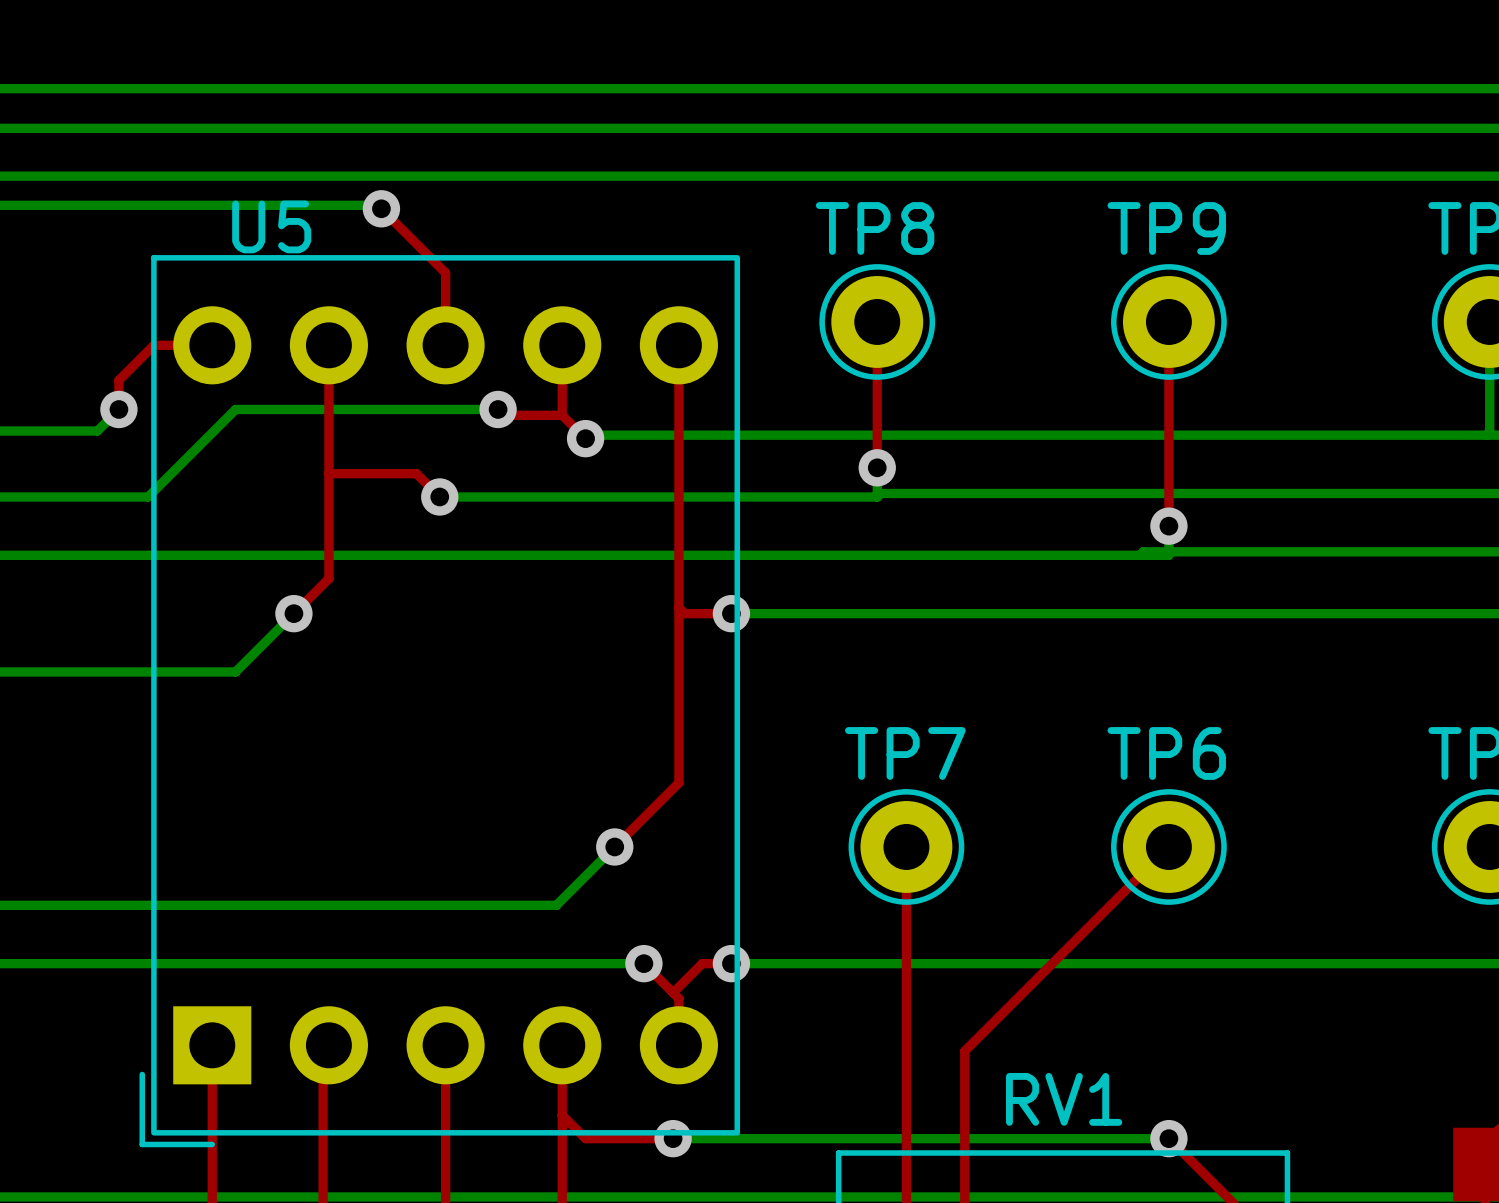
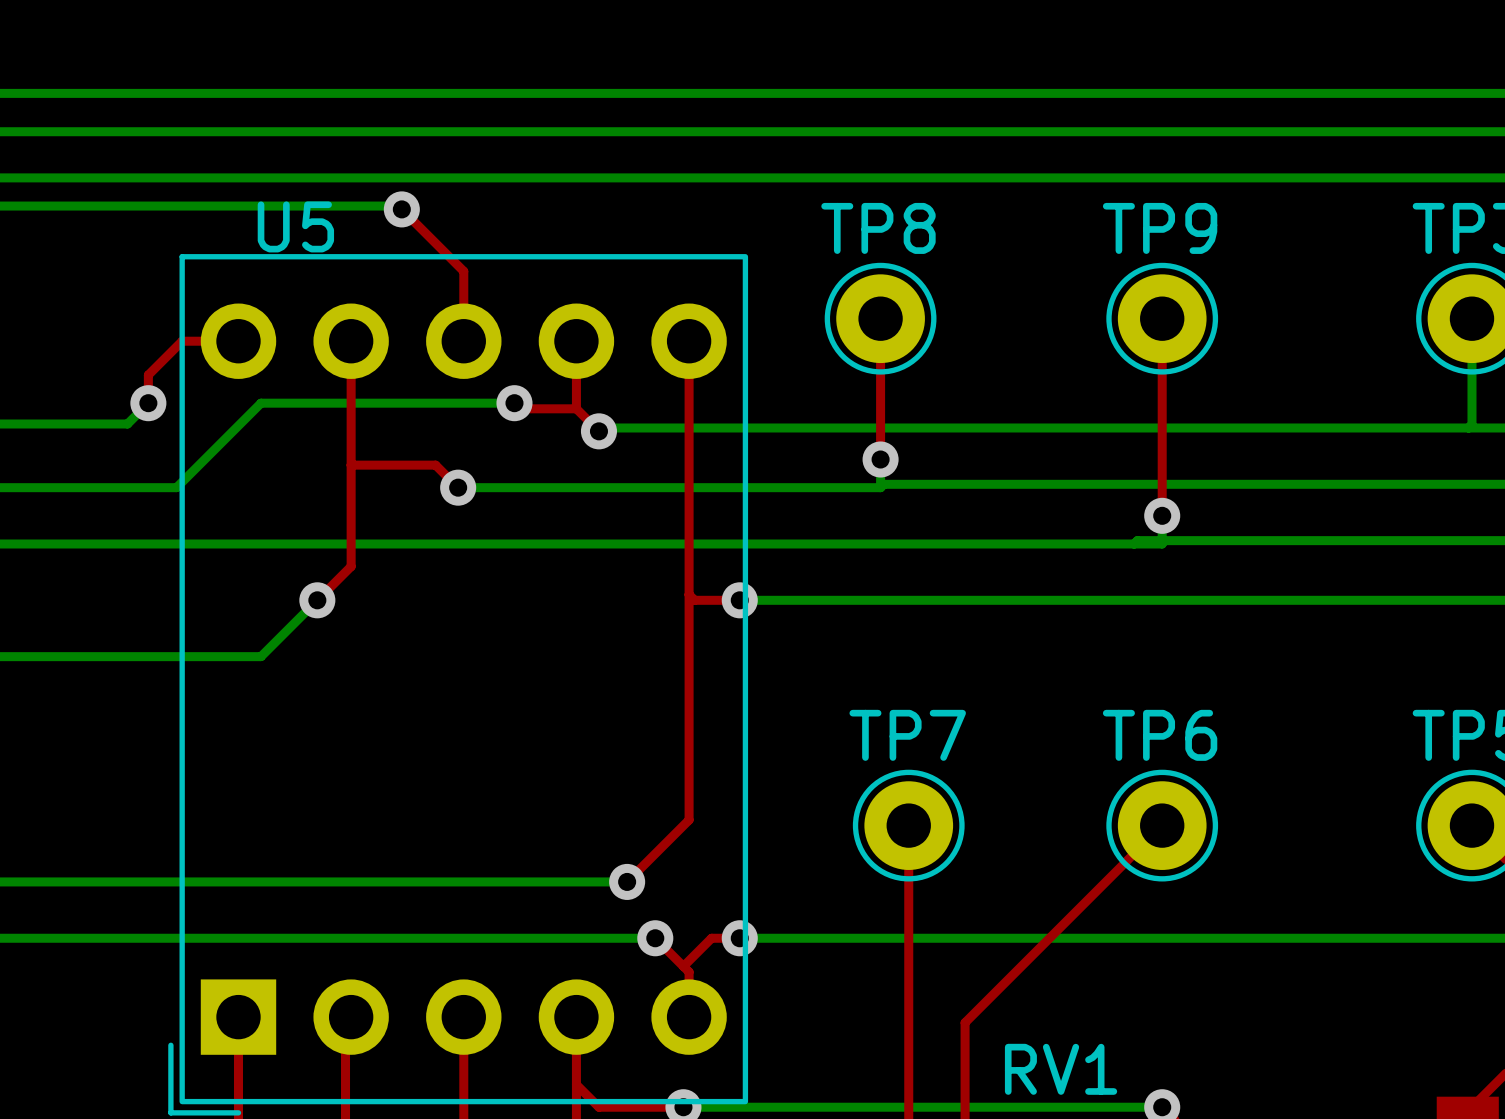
top track: (678, 782) (614, 846) -> (689, 763) (689, 819) (627, 881)
bottom track: (614, 846) (556, 905) -> (627, 881) (570, 881)
via position: (614, 846) -> (627, 881)

